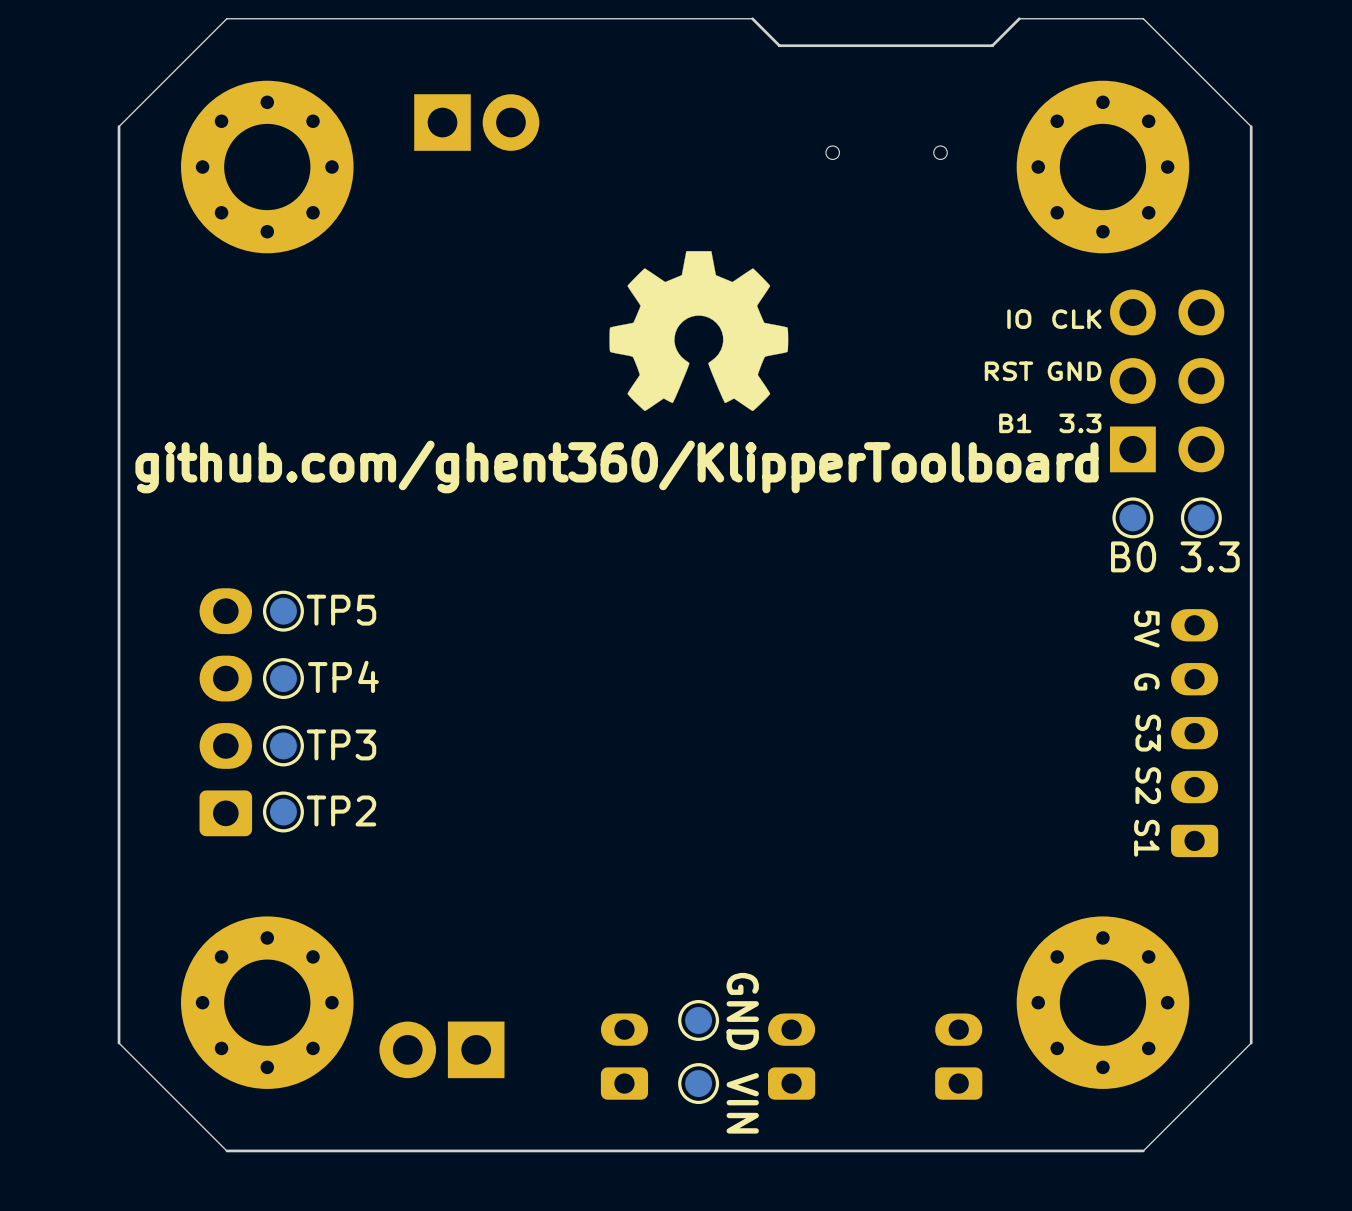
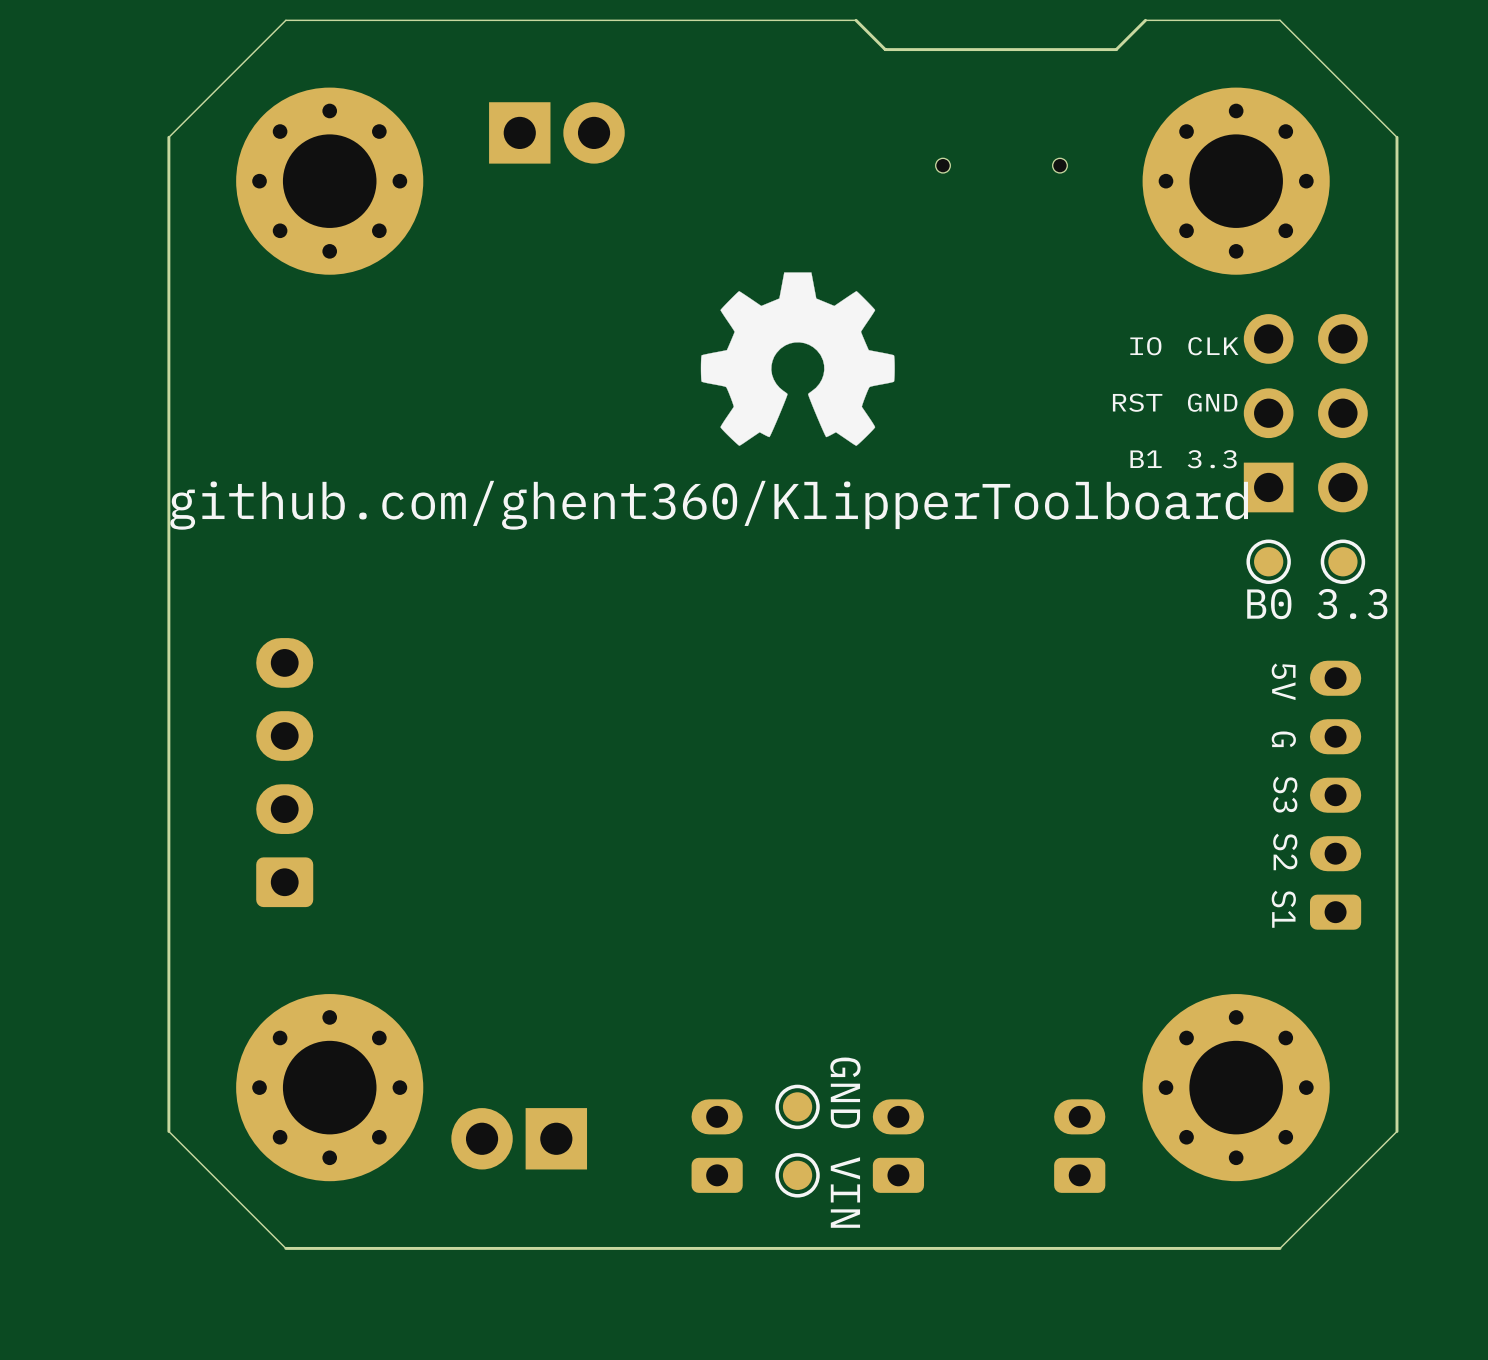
TP5: (283, 611) -> none
TP4: (283, 678) -> none
TP3: (283, 745) -> none
TP2: (283, 811) -> none

